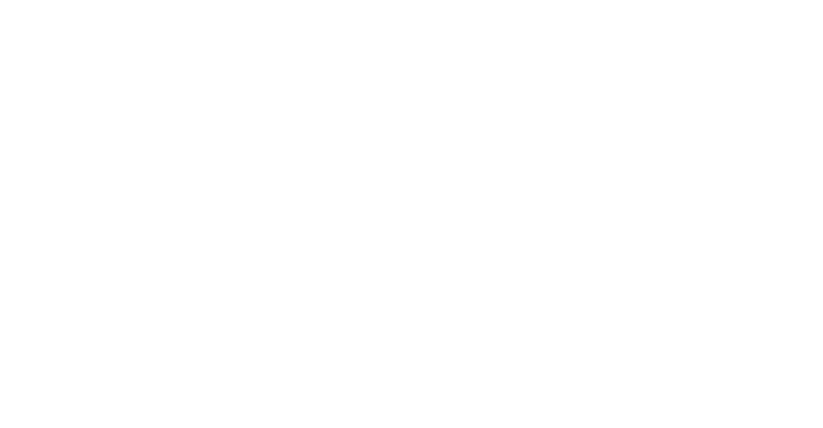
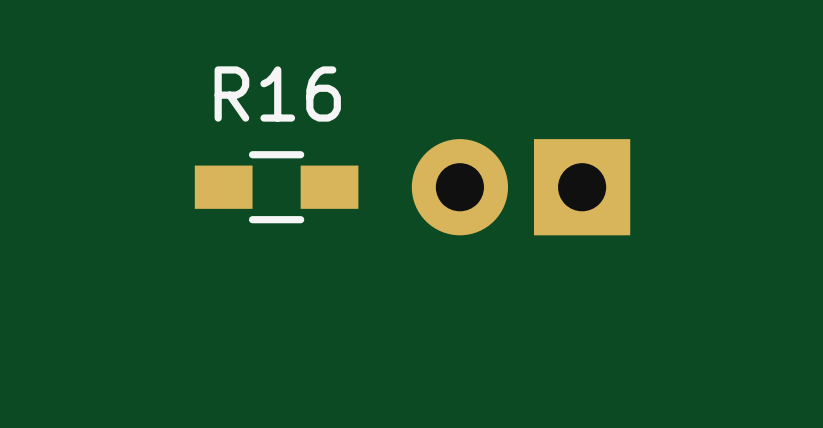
R16: none -> (276, 187)
part: none -> (521, 187)

